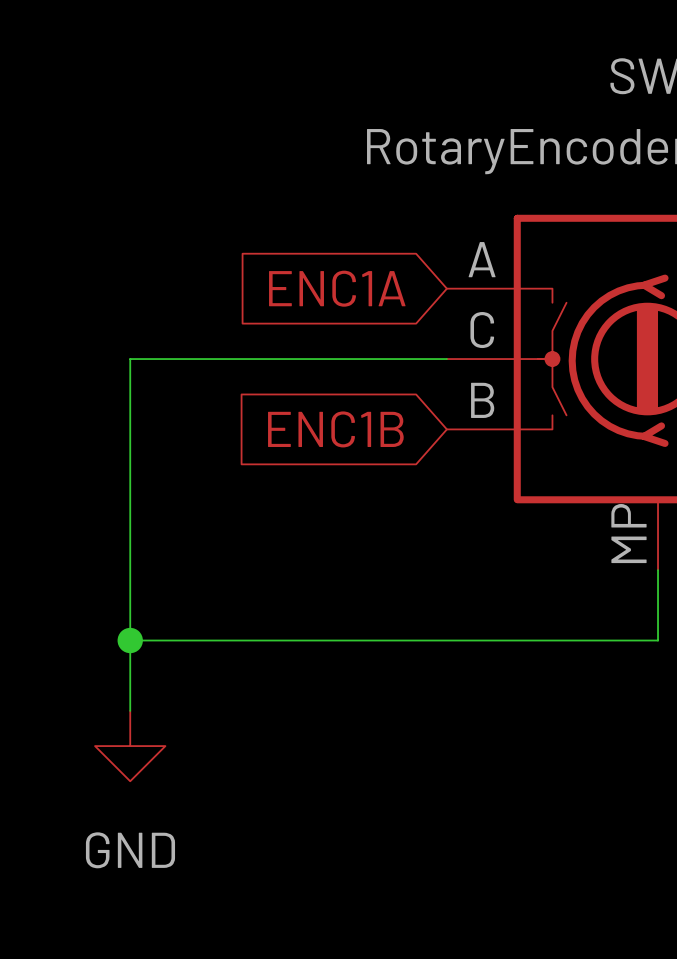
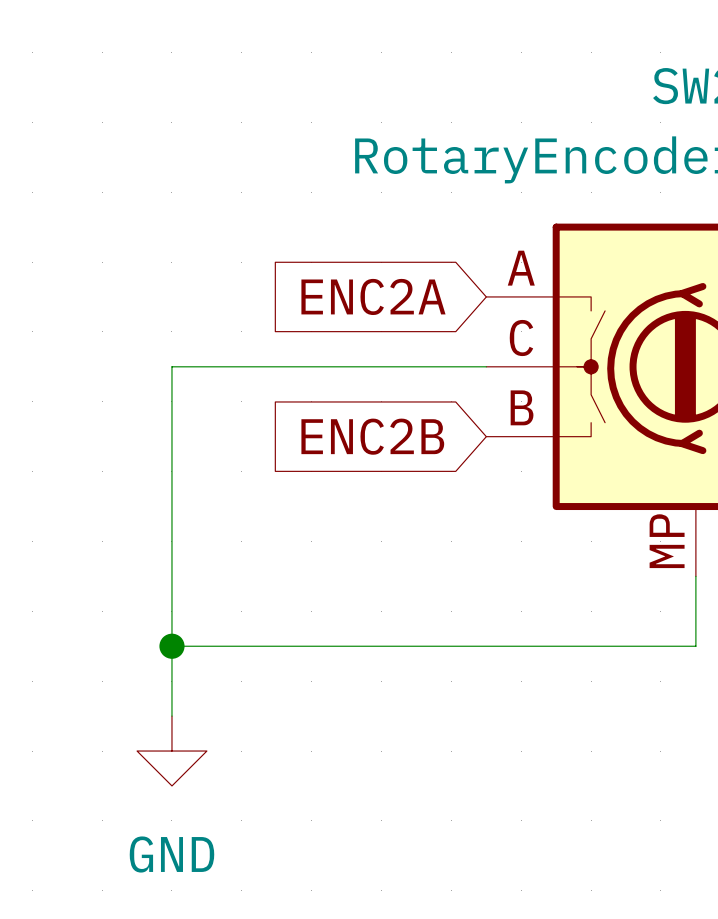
global label: ENC1A (337, 288) -> ENC2A (373, 296)
global label: ENC1B (335, 429) -> ENC2B (372, 436)

